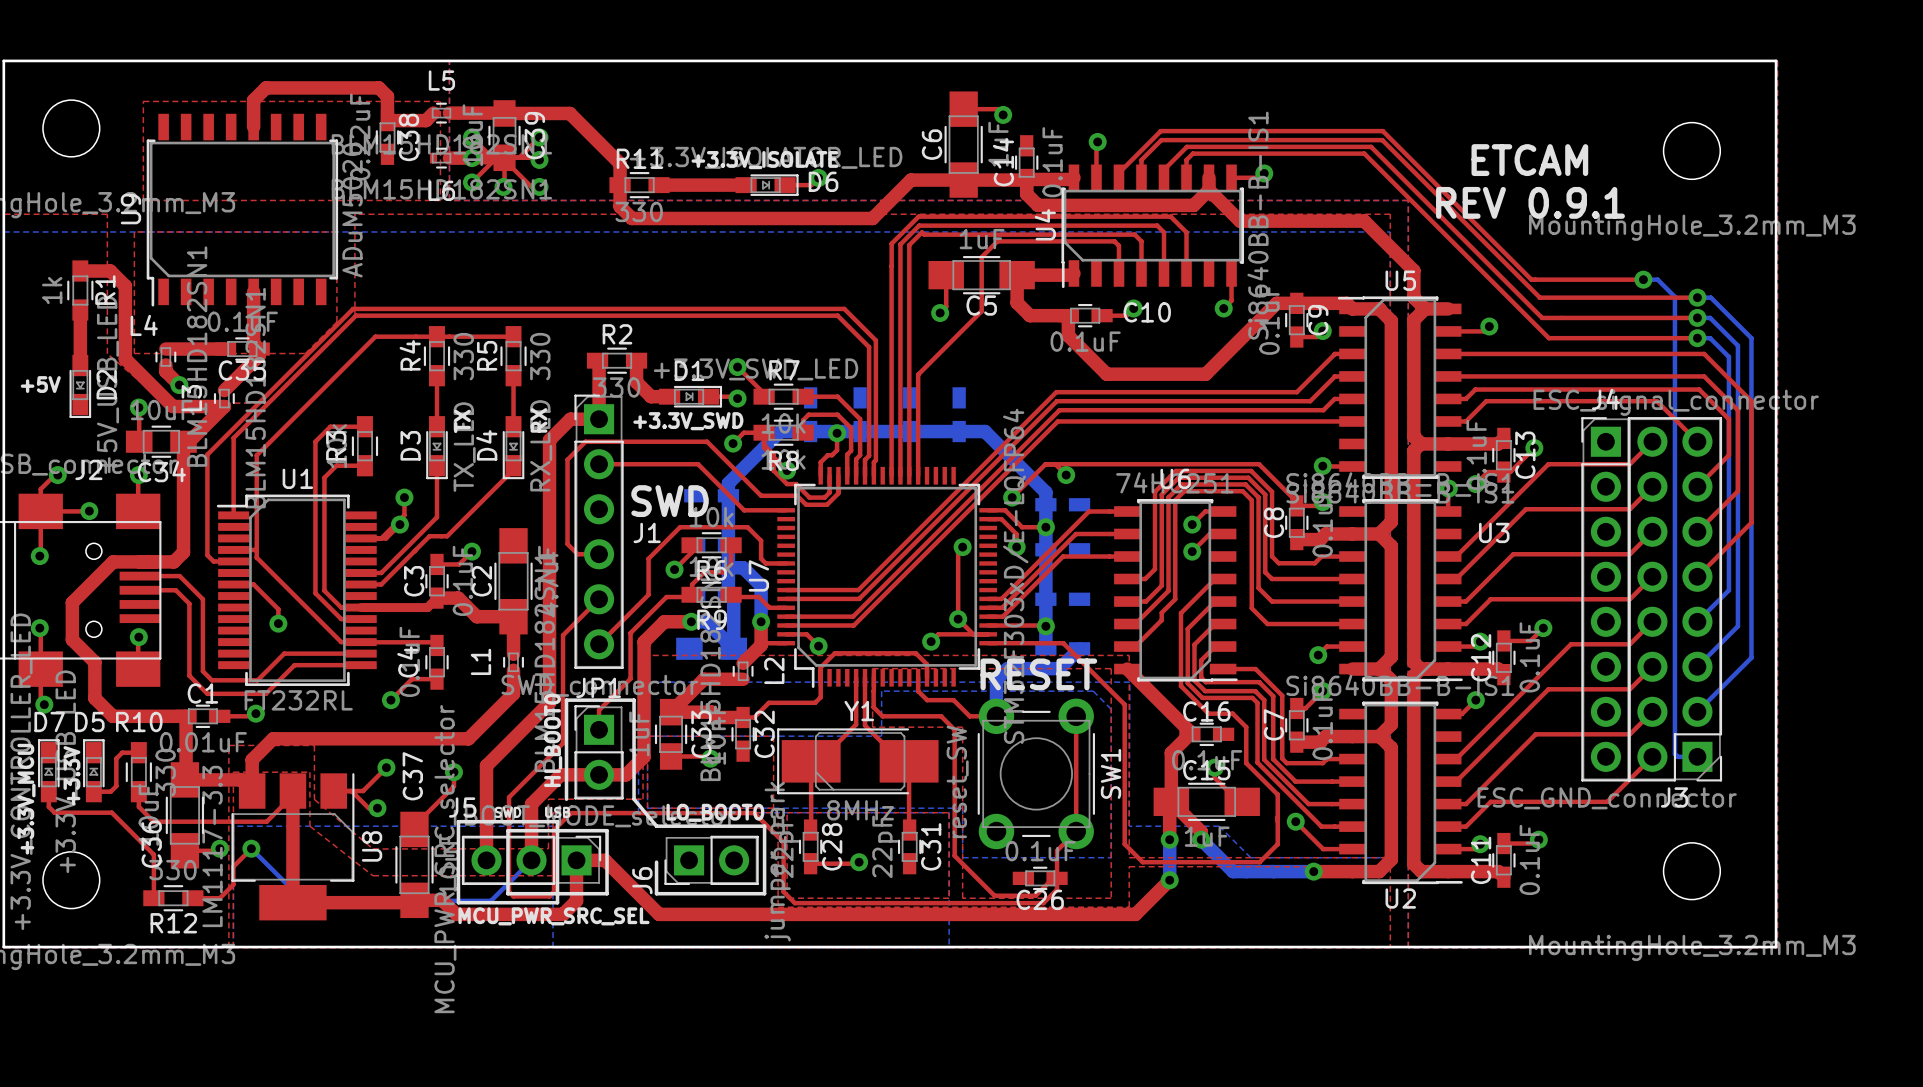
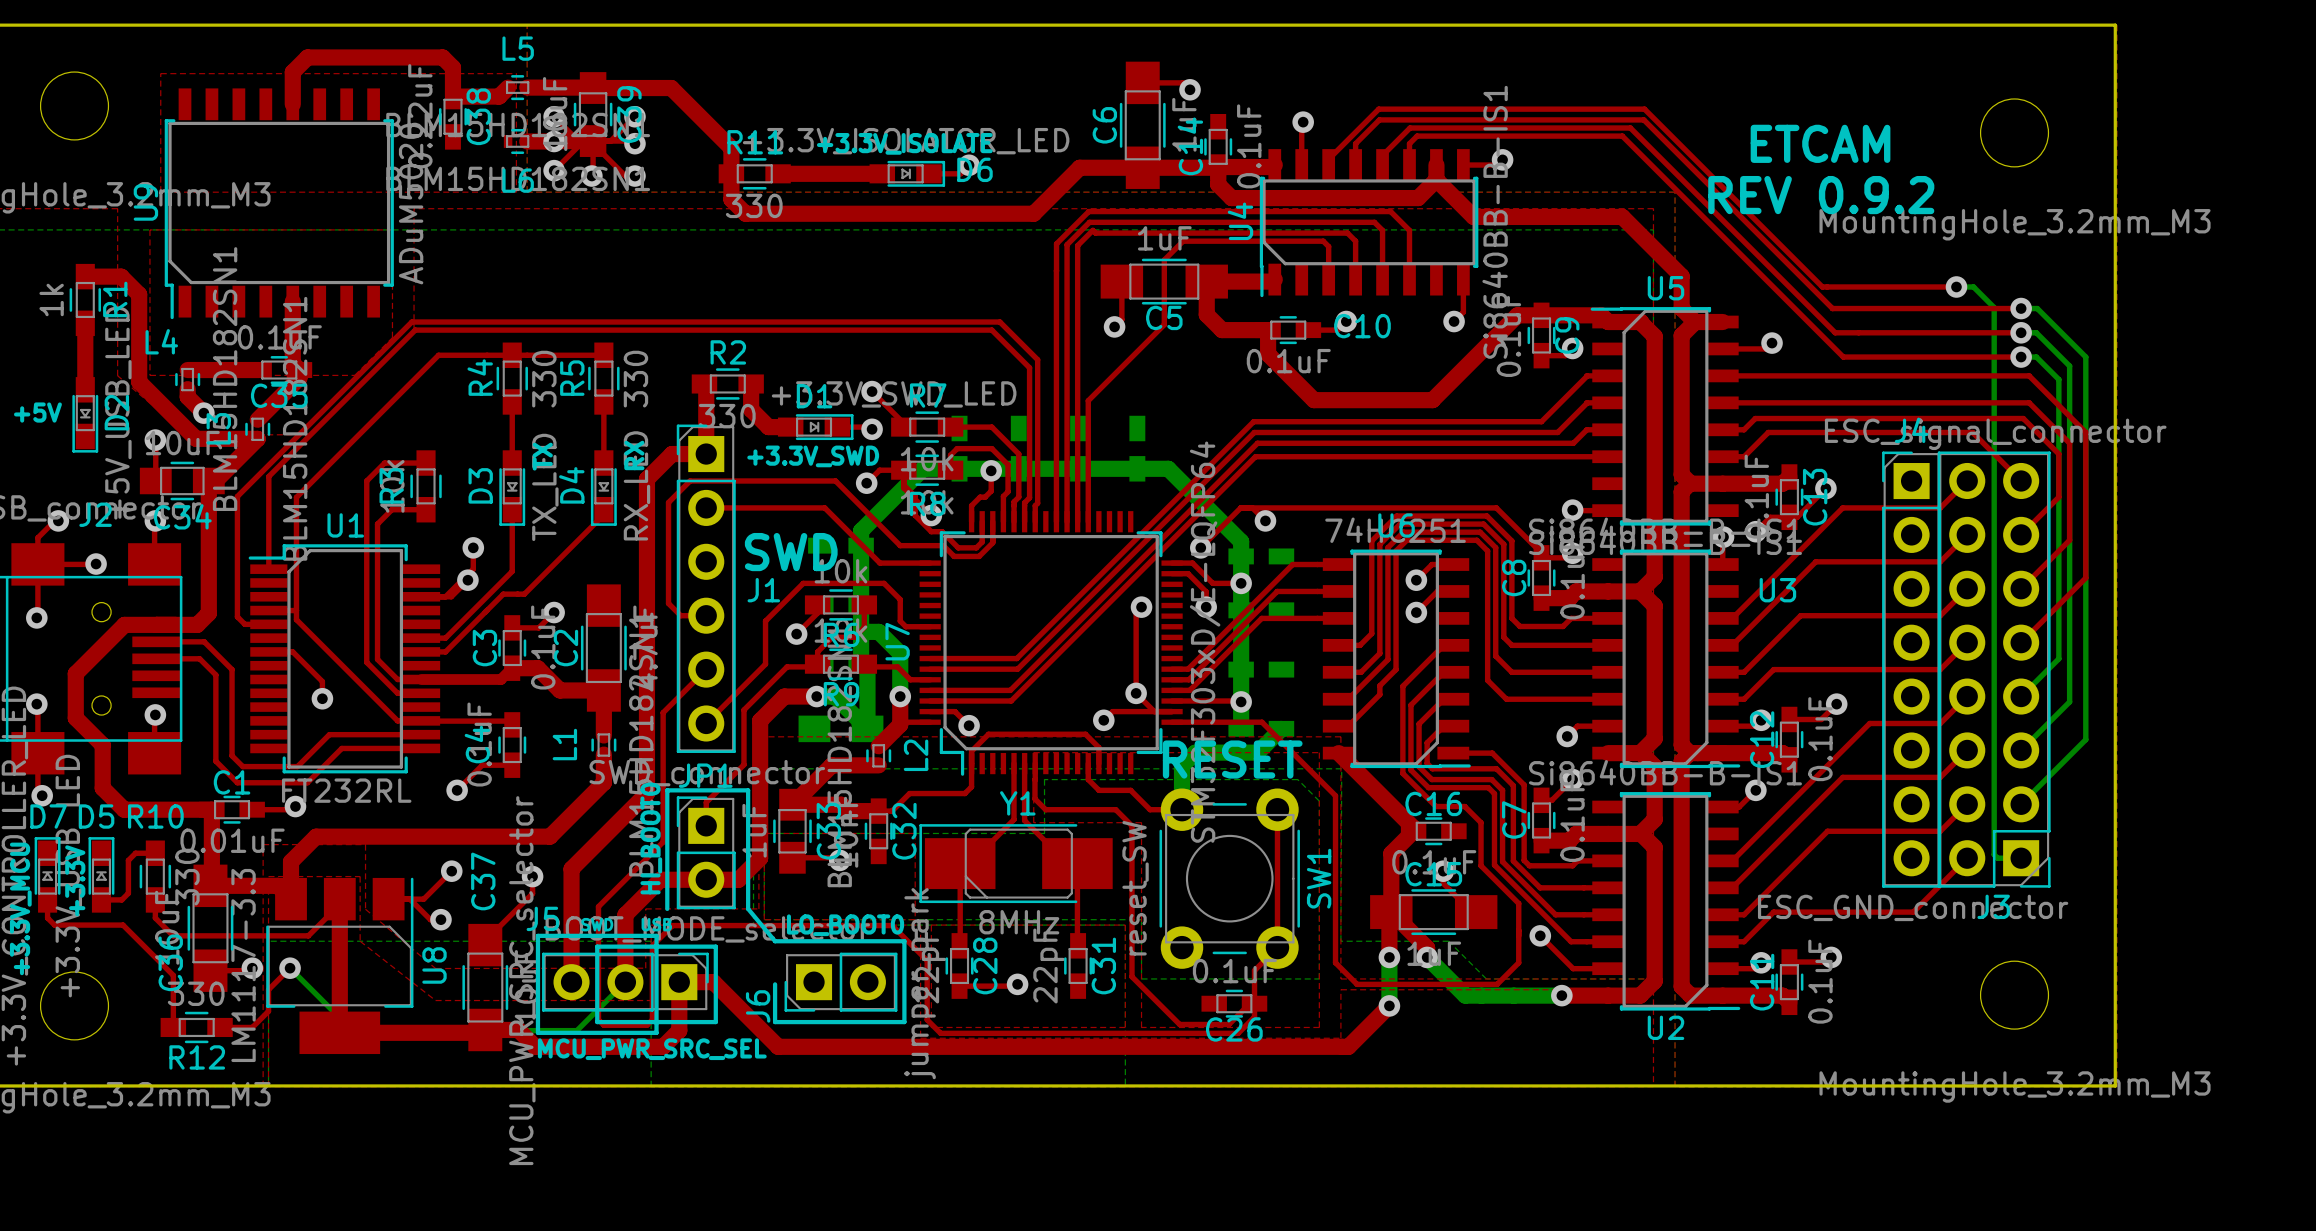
text: REV 0.9.1 (1530, 202) -> REV 0.9.2 (1821, 195)

